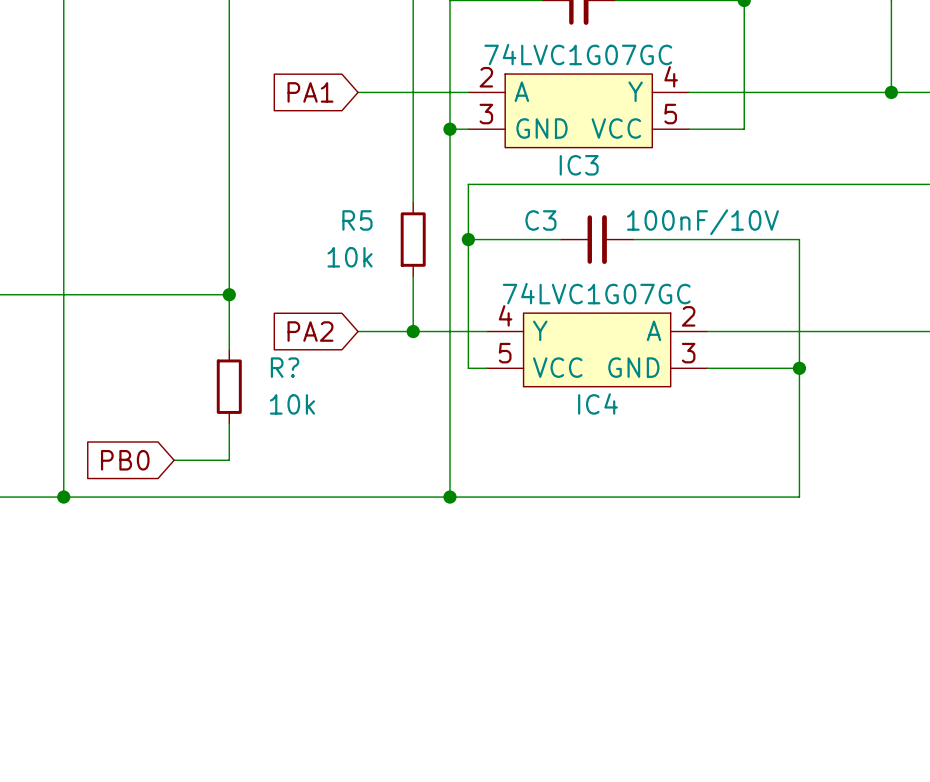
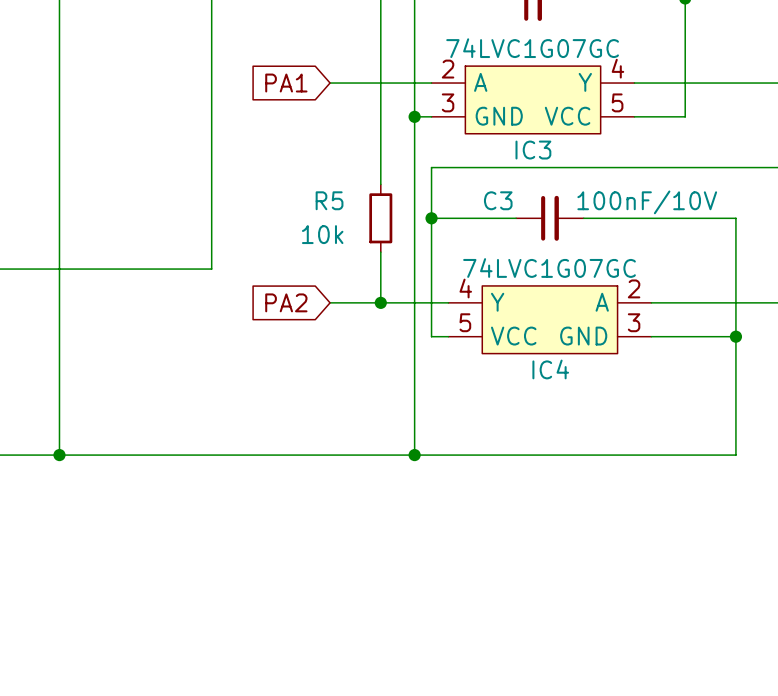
wire: (229, 294) (229, 349) -> none
junction: (229, 294) -> none
R?: 10k (229, 386) -> none
wire: (229, 423) (229, 460) (174, 460) -> none
global label: PB0 (125, 460) -> none

